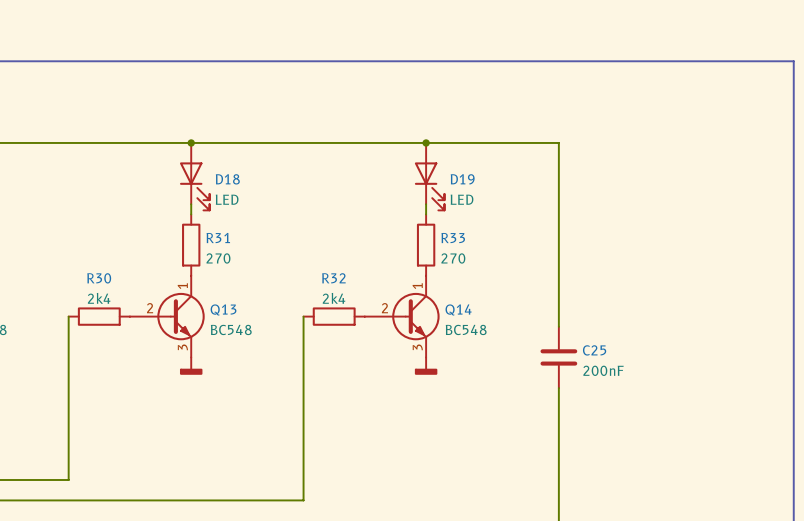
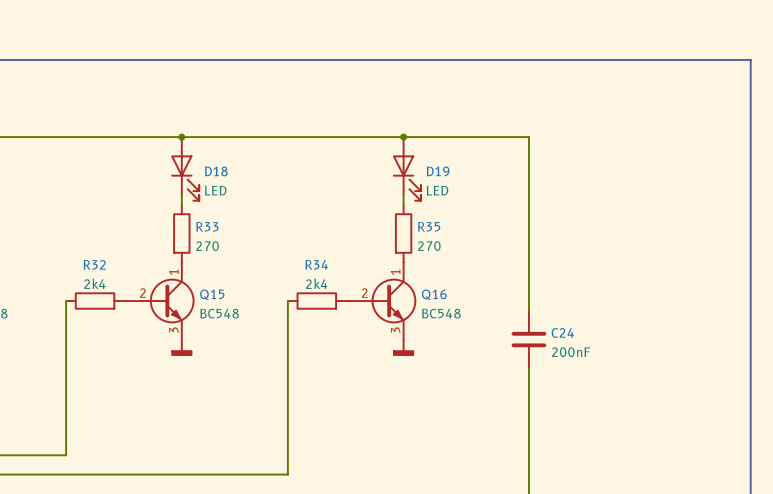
R31 name: R31 (218, 238) -> R33 (207, 226)
R33 name: R33 (453, 238) -> R35 (429, 226)
R30 name: R30 (99, 278) -> R32 (94, 264)
R32 name: R32 (333, 278) -> R34 (316, 264)
Q13 name: Q13 (223, 309) -> Q15 (212, 294)
Q14 name: Q14 (458, 309) -> Q16 (434, 294)
C25 name: C25 (594, 350) -> C24 (562, 332)

